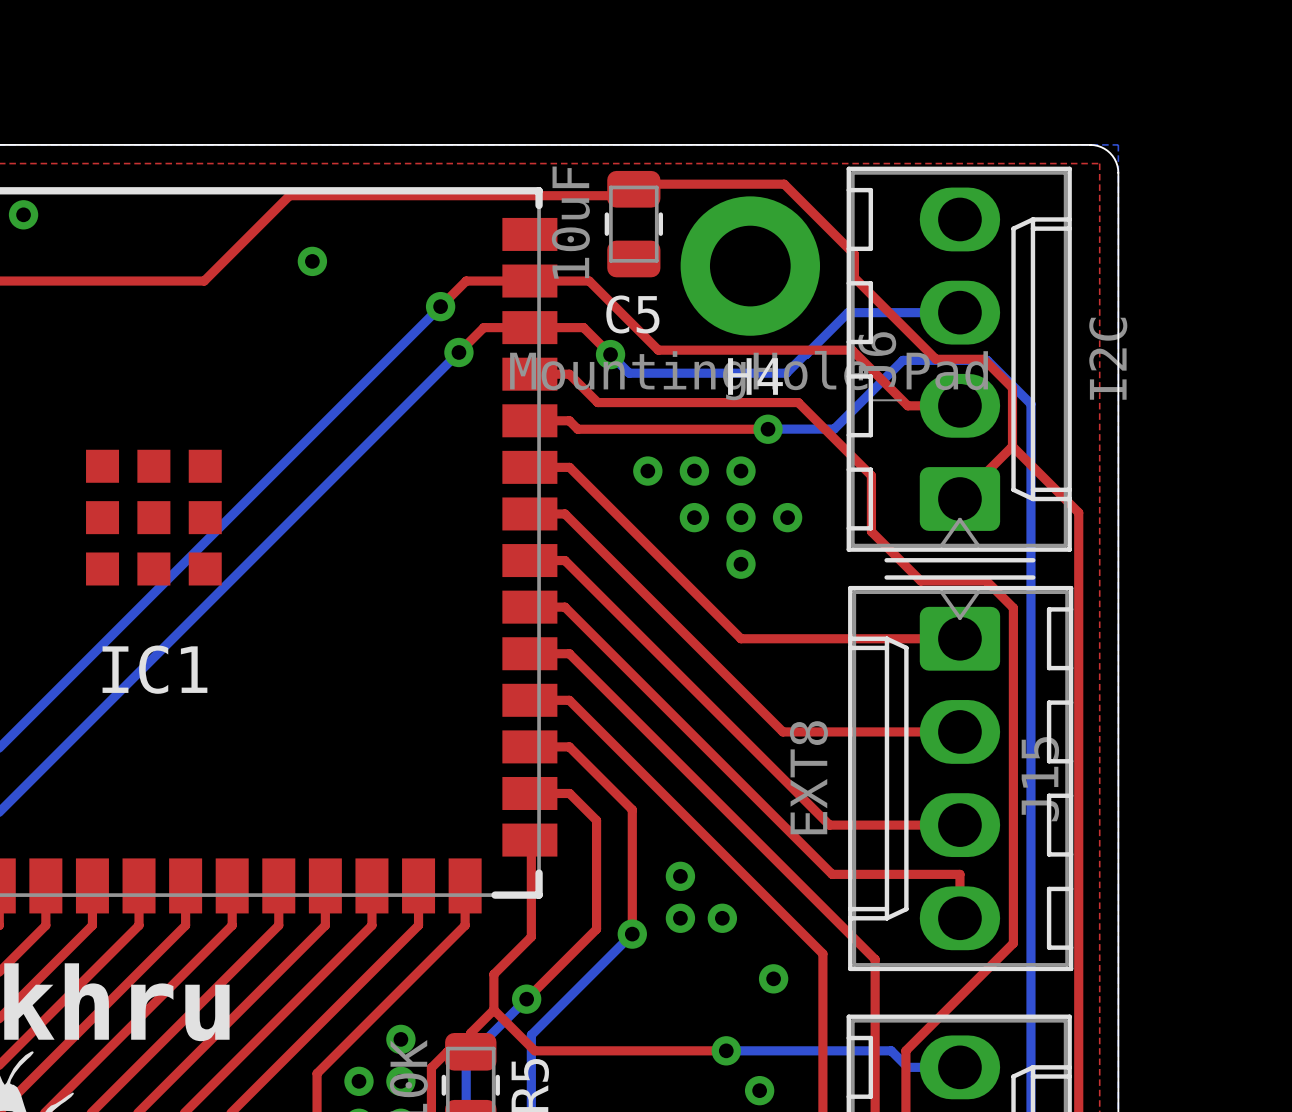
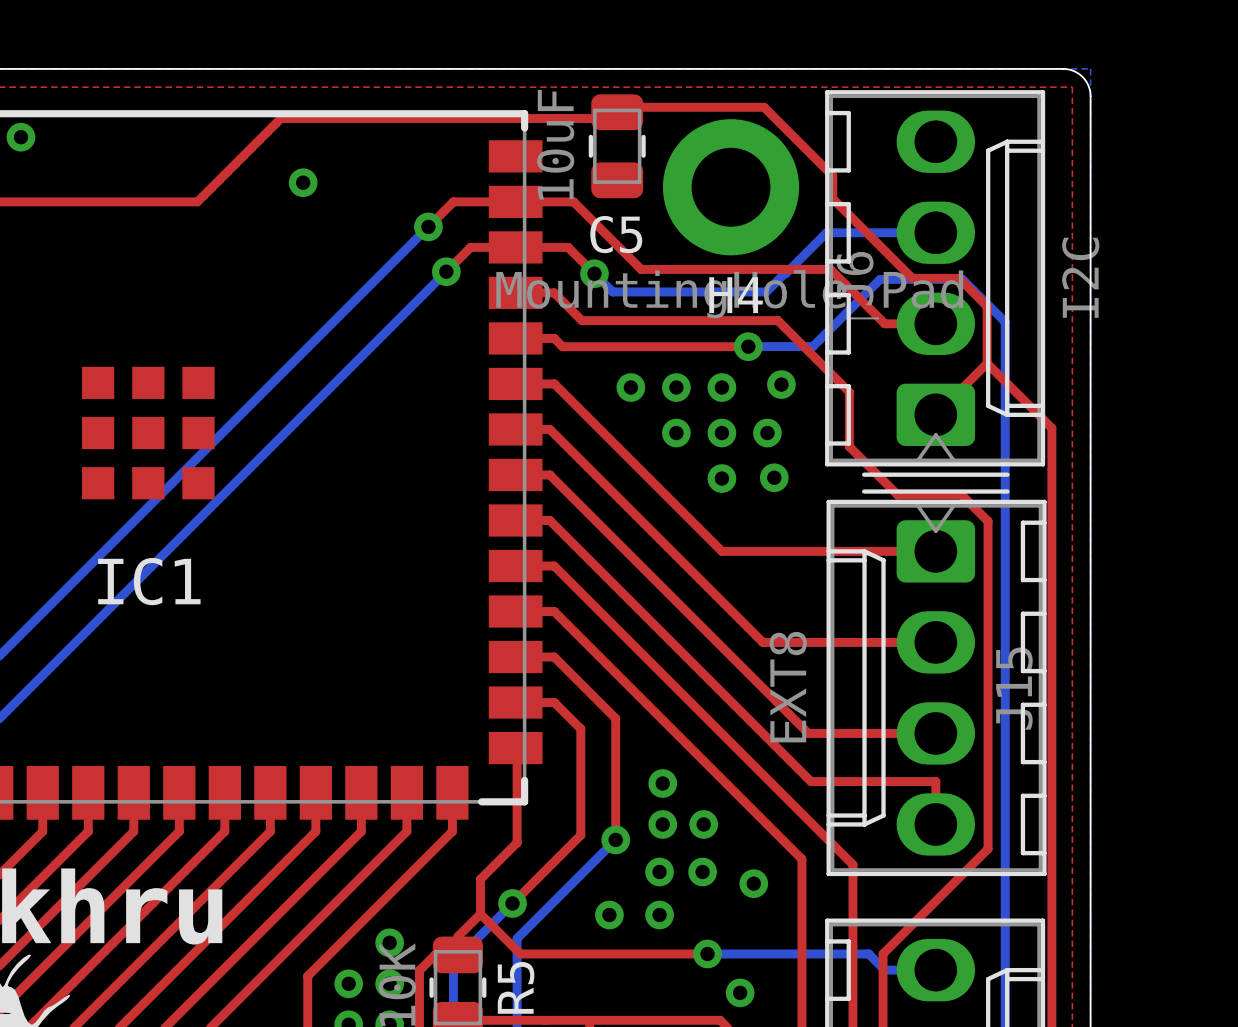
via: none -> (781, 384)
via: none -> (774, 477)
via: none -> (659, 872)
via: none -> (702, 872)
via: none -> (609, 915)
via: none -> (659, 915)

